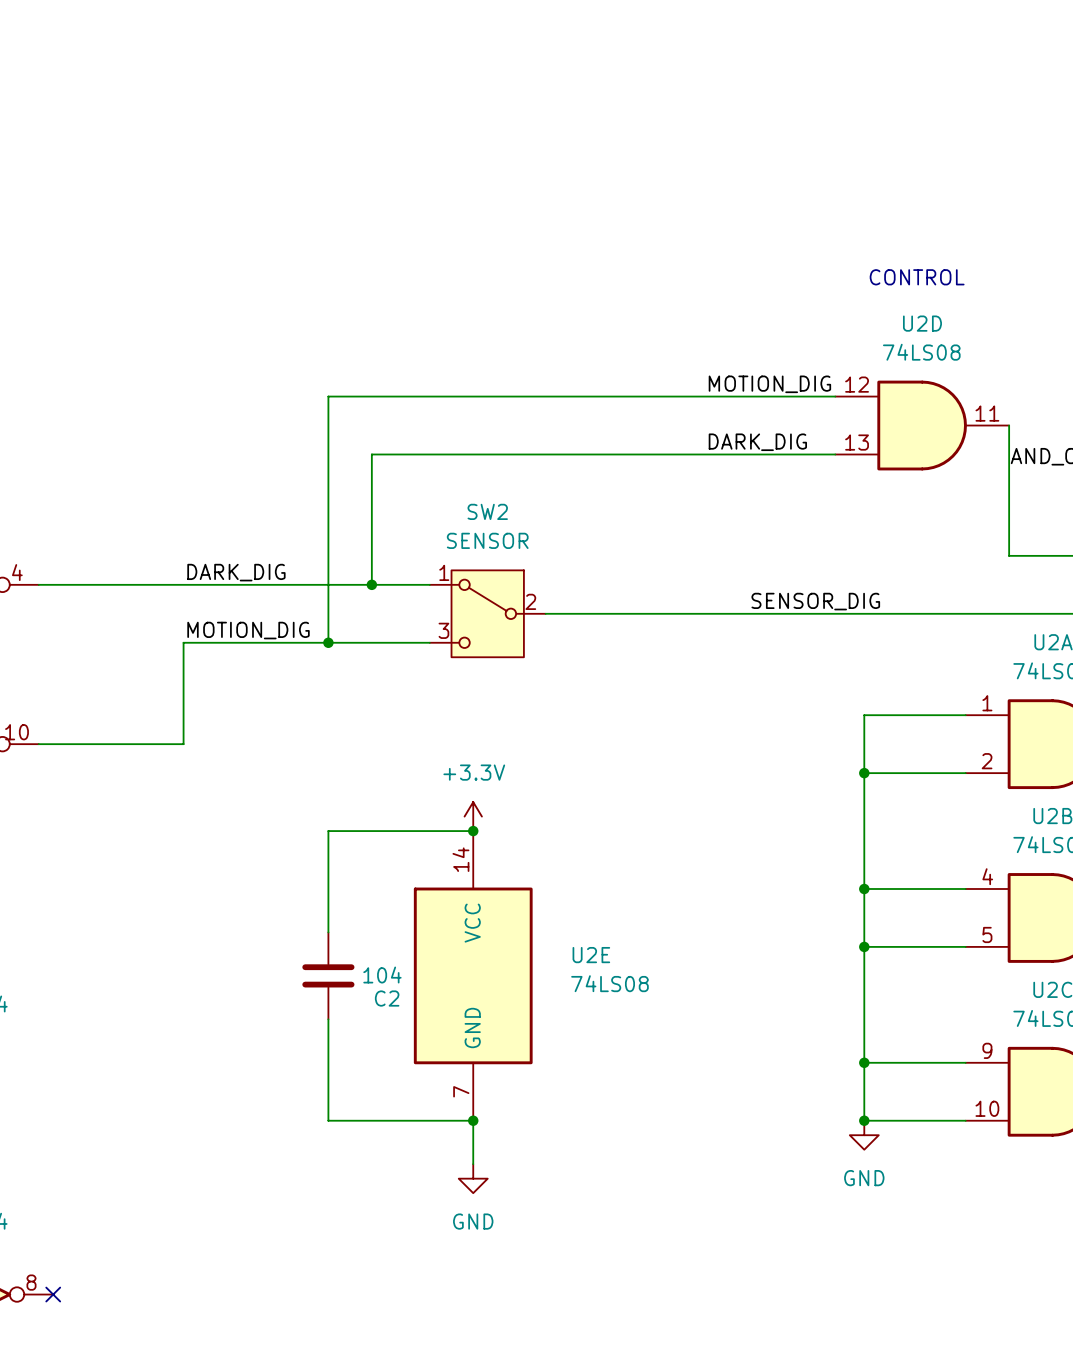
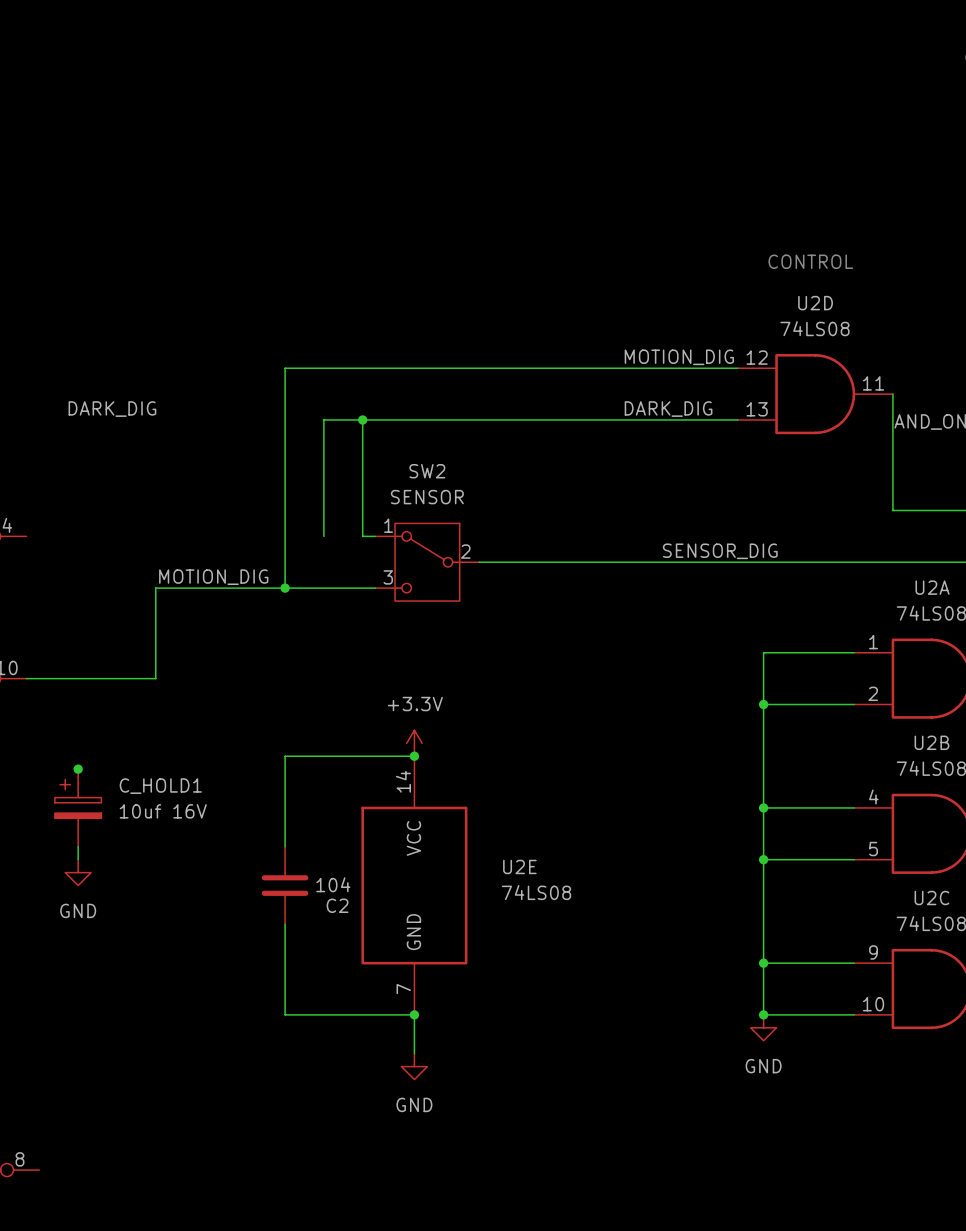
junction: none -> (362, 419)
label position: DARK_DIG (236, 572) -> DARK_DIG (112, 409)
wire: (38, 584) (415, 584) -> (362, 419) (362, 536)
junction: (371, 584) -> none
junction: none -> (78, 769)
C_HOLD1: none -> 10uf 16V (78, 807)
wire: none -> (78, 846) (78, 859)
power symbol: none -> GND (78, 872)
no-connect mark: (53, 1294) -> none

